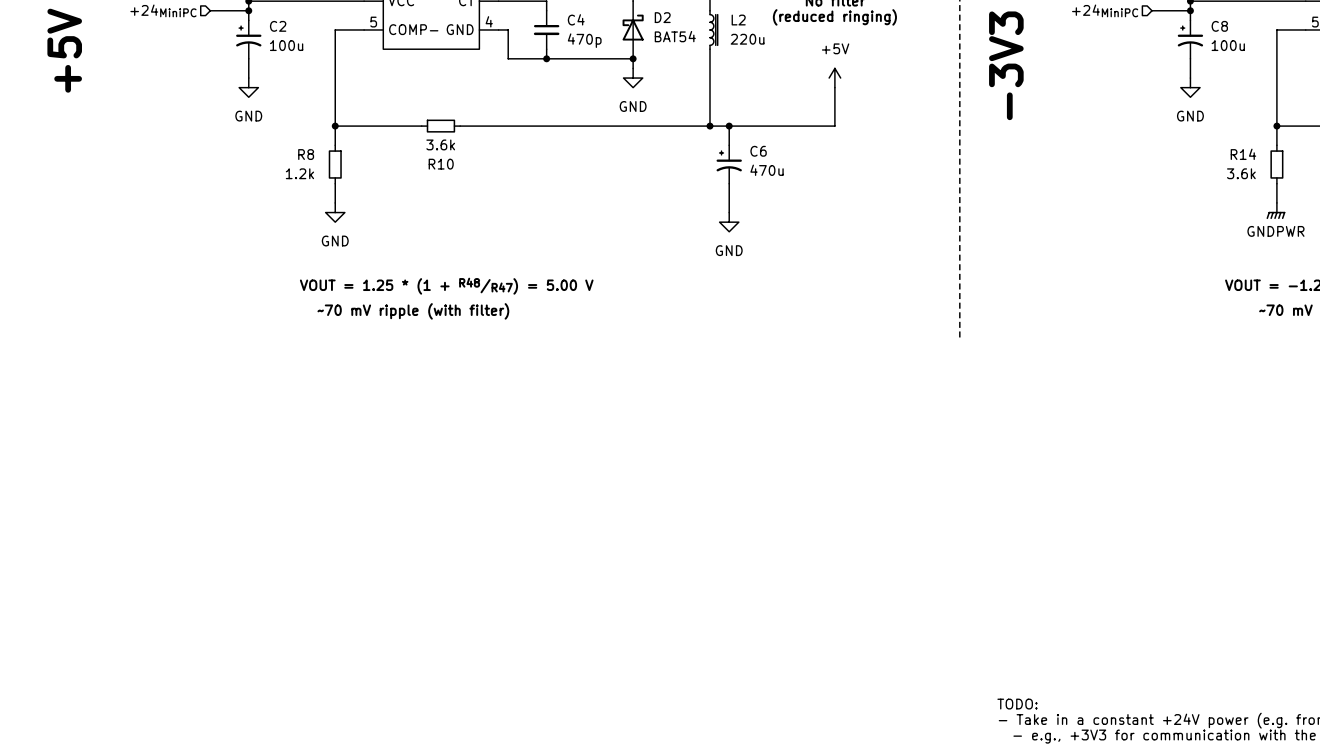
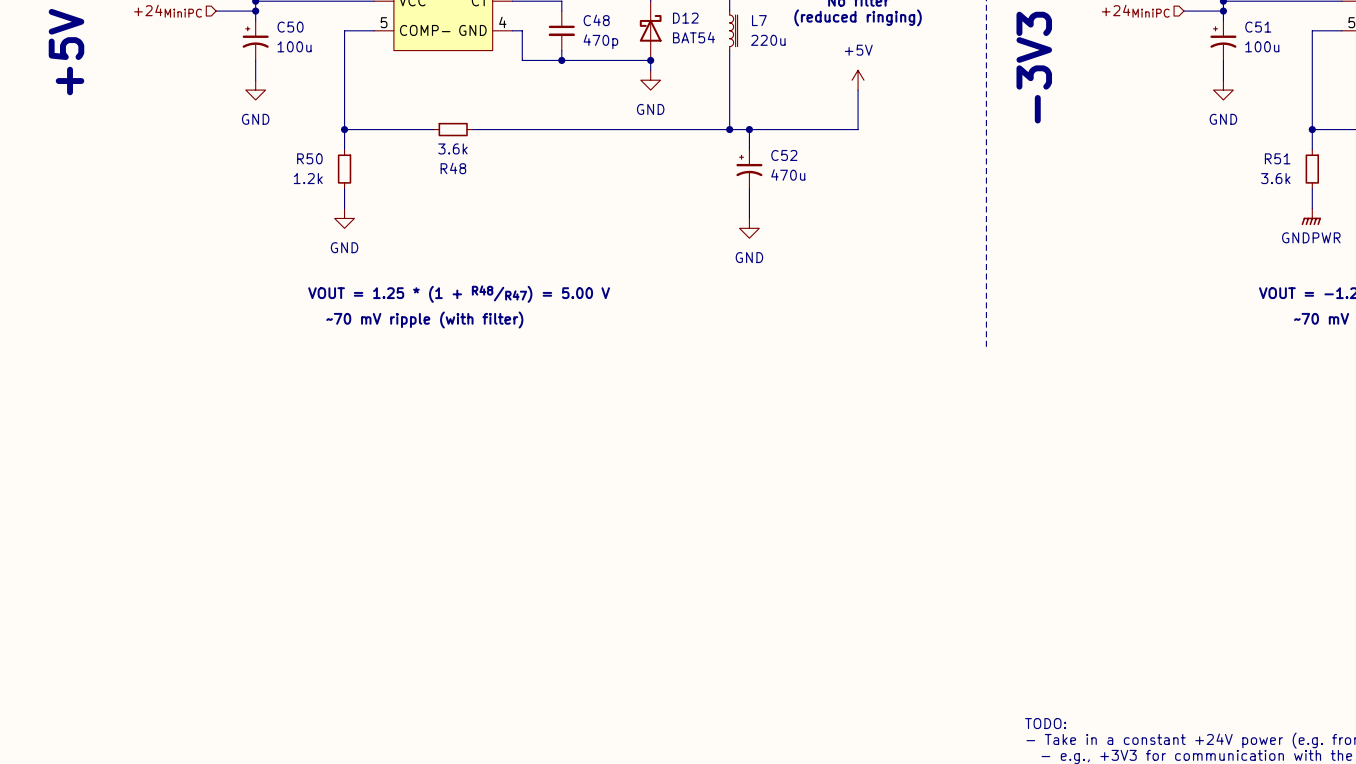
D2 name: D2 (662, 17) -> D12 (685, 18)
C4 name: C4 (576, 19) -> C48 (596, 20)
L2 name: L2 (738, 20) -> L7 (759, 20)
C2 name: C2 (278, 26) -> C50 (290, 27)
C8 name: C8 (1219, 26) -> C51 (1258, 27)
C6 name: C6 (758, 151) -> C52 (784, 155)
R8 name: R8 (306, 154) -> R50 (309, 158)
R14 name: R14 (1243, 154) -> R51 (1277, 158)
R10 name: R10 (441, 164) -> R48 (453, 168)

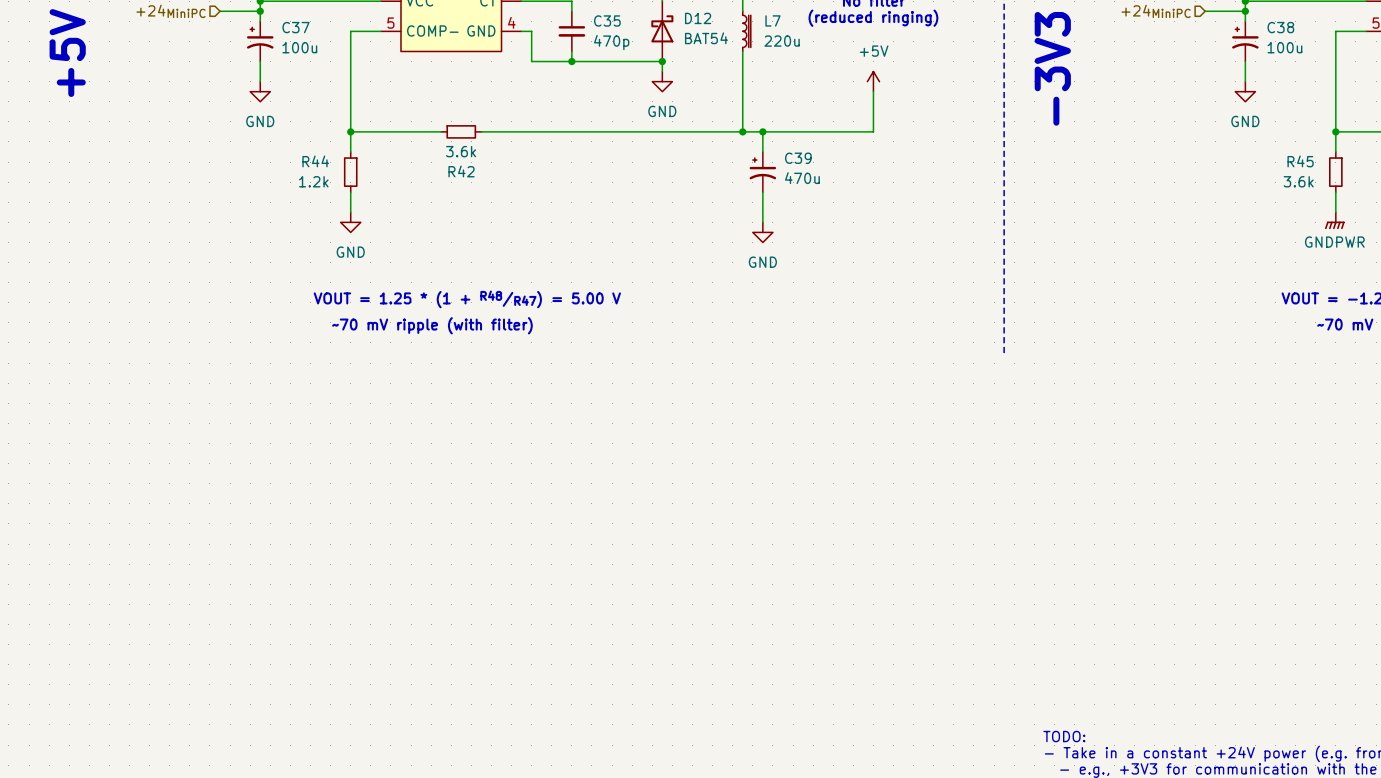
C48 name: C48 (596, 20) -> C35 (607, 20)
C50 name: C50 (290, 27) -> C37 (295, 27)
C51 name: C51 (1258, 27) -> C38 (1280, 27)
C52 name: C52 (784, 155) -> C39 (798, 158)
R50 name: R50 (309, 158) -> R44 (315, 161)
R51 name: R51 (1277, 158) -> R45 (1300, 161)
R48 name: R48 (453, 168) -> R42 (461, 171)

